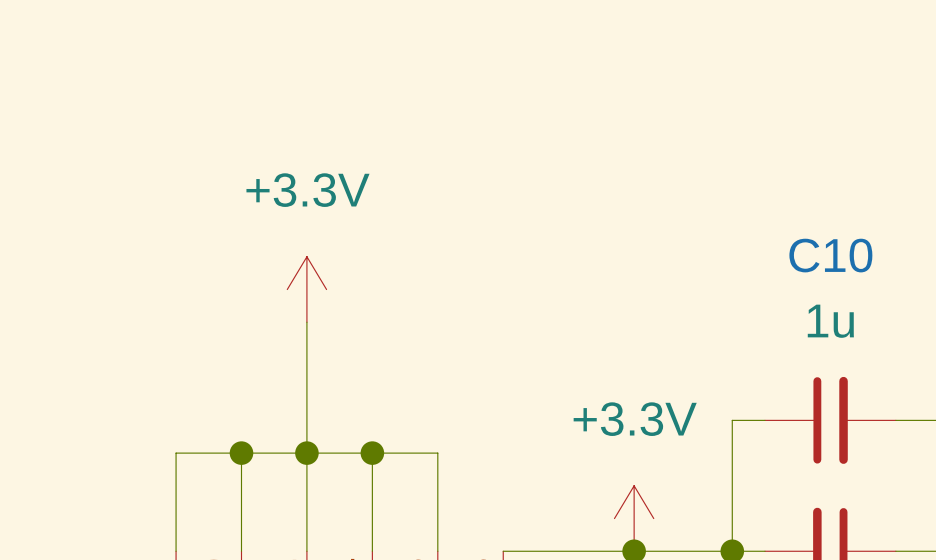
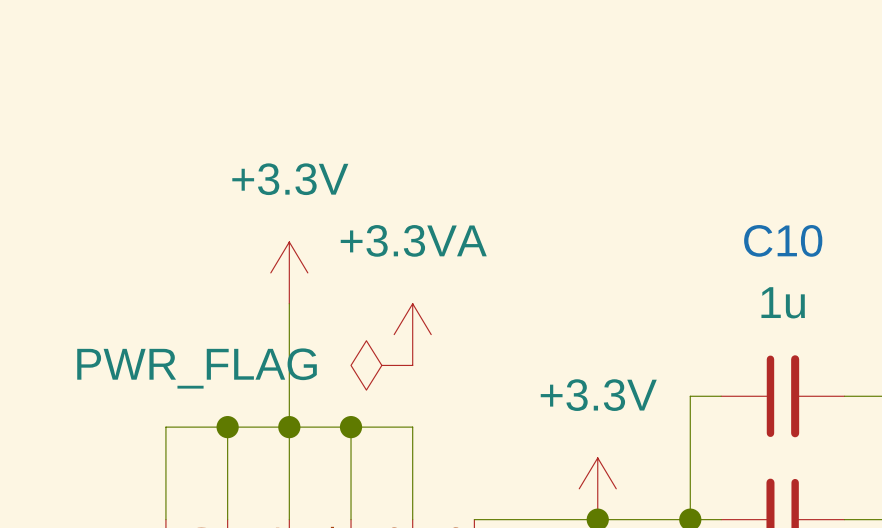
power symbol: none -> +3.3VA (412, 334)
power symbol: none -> PWR_FLAG (381, 365)

